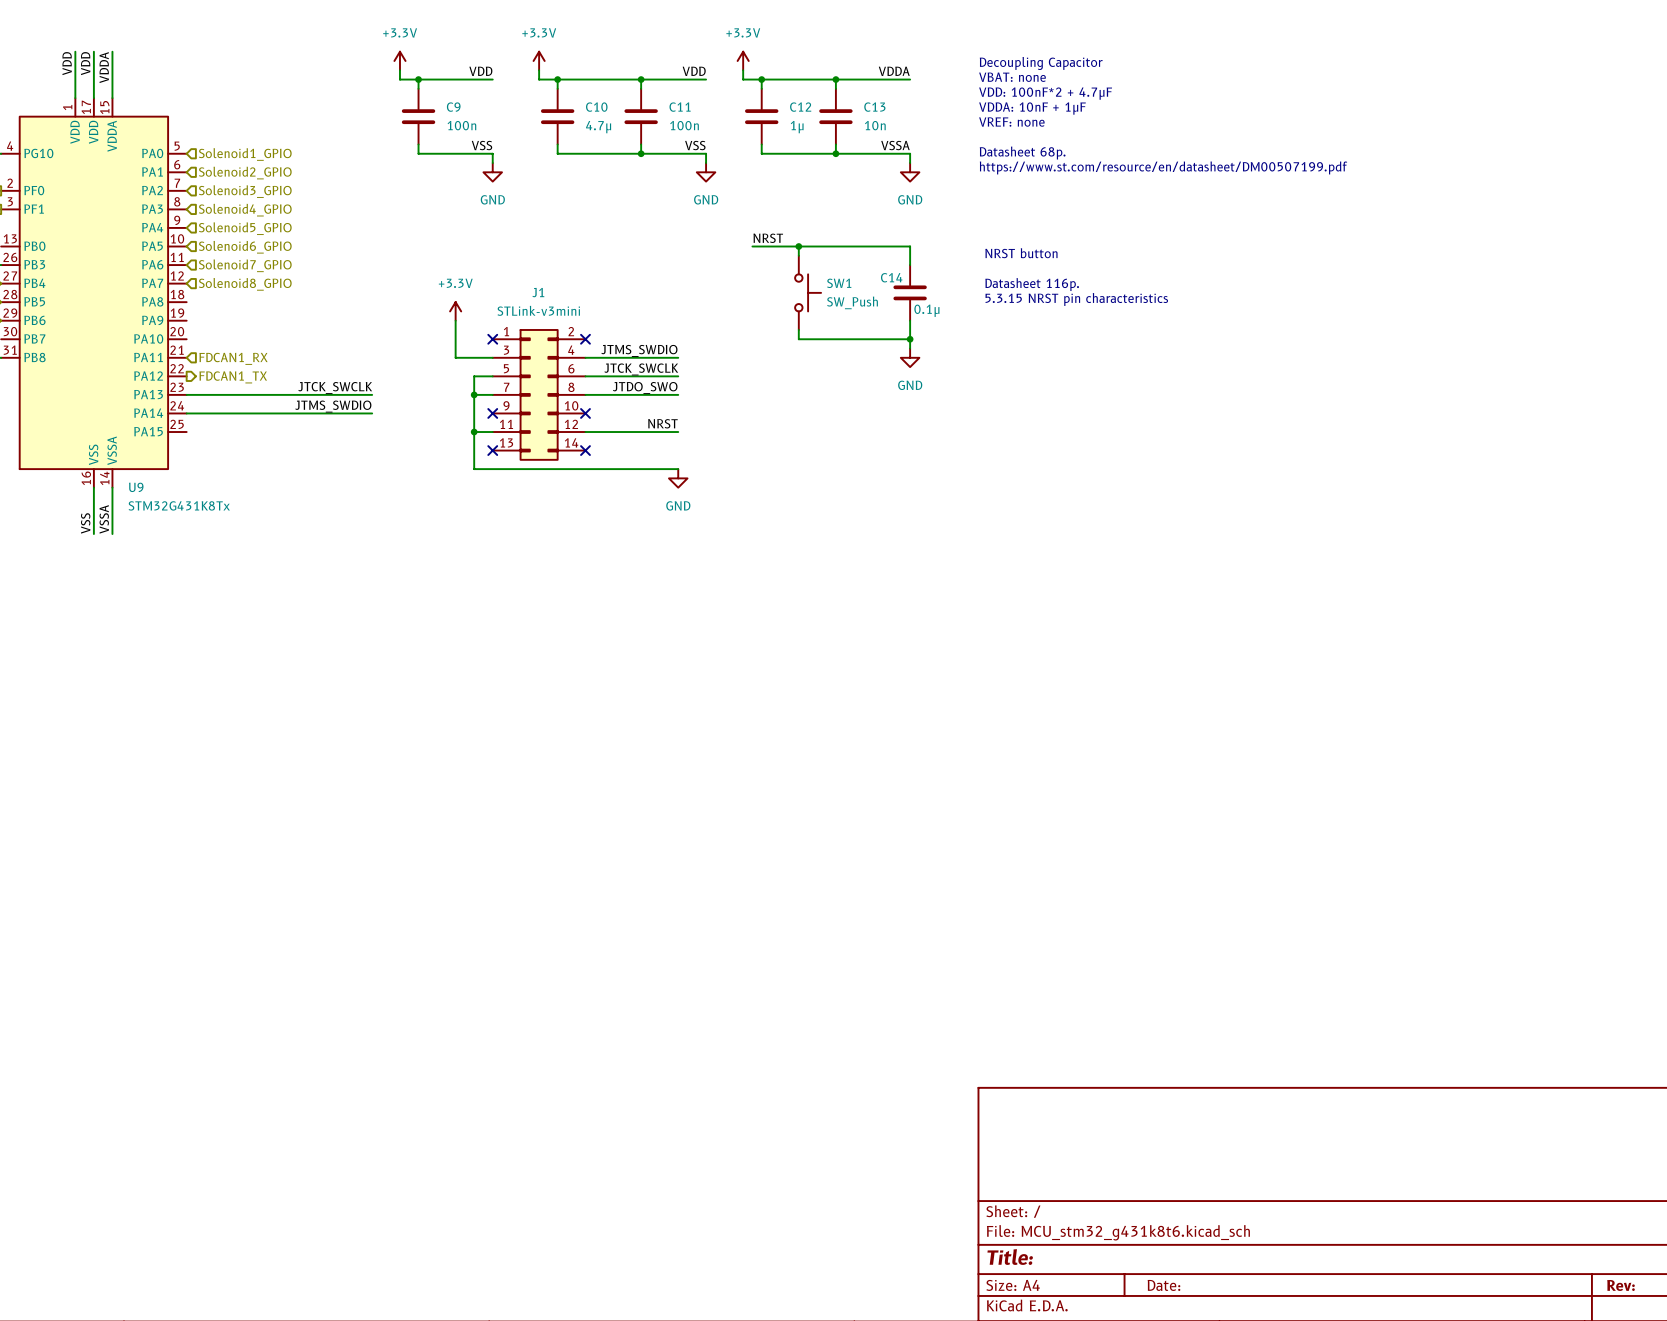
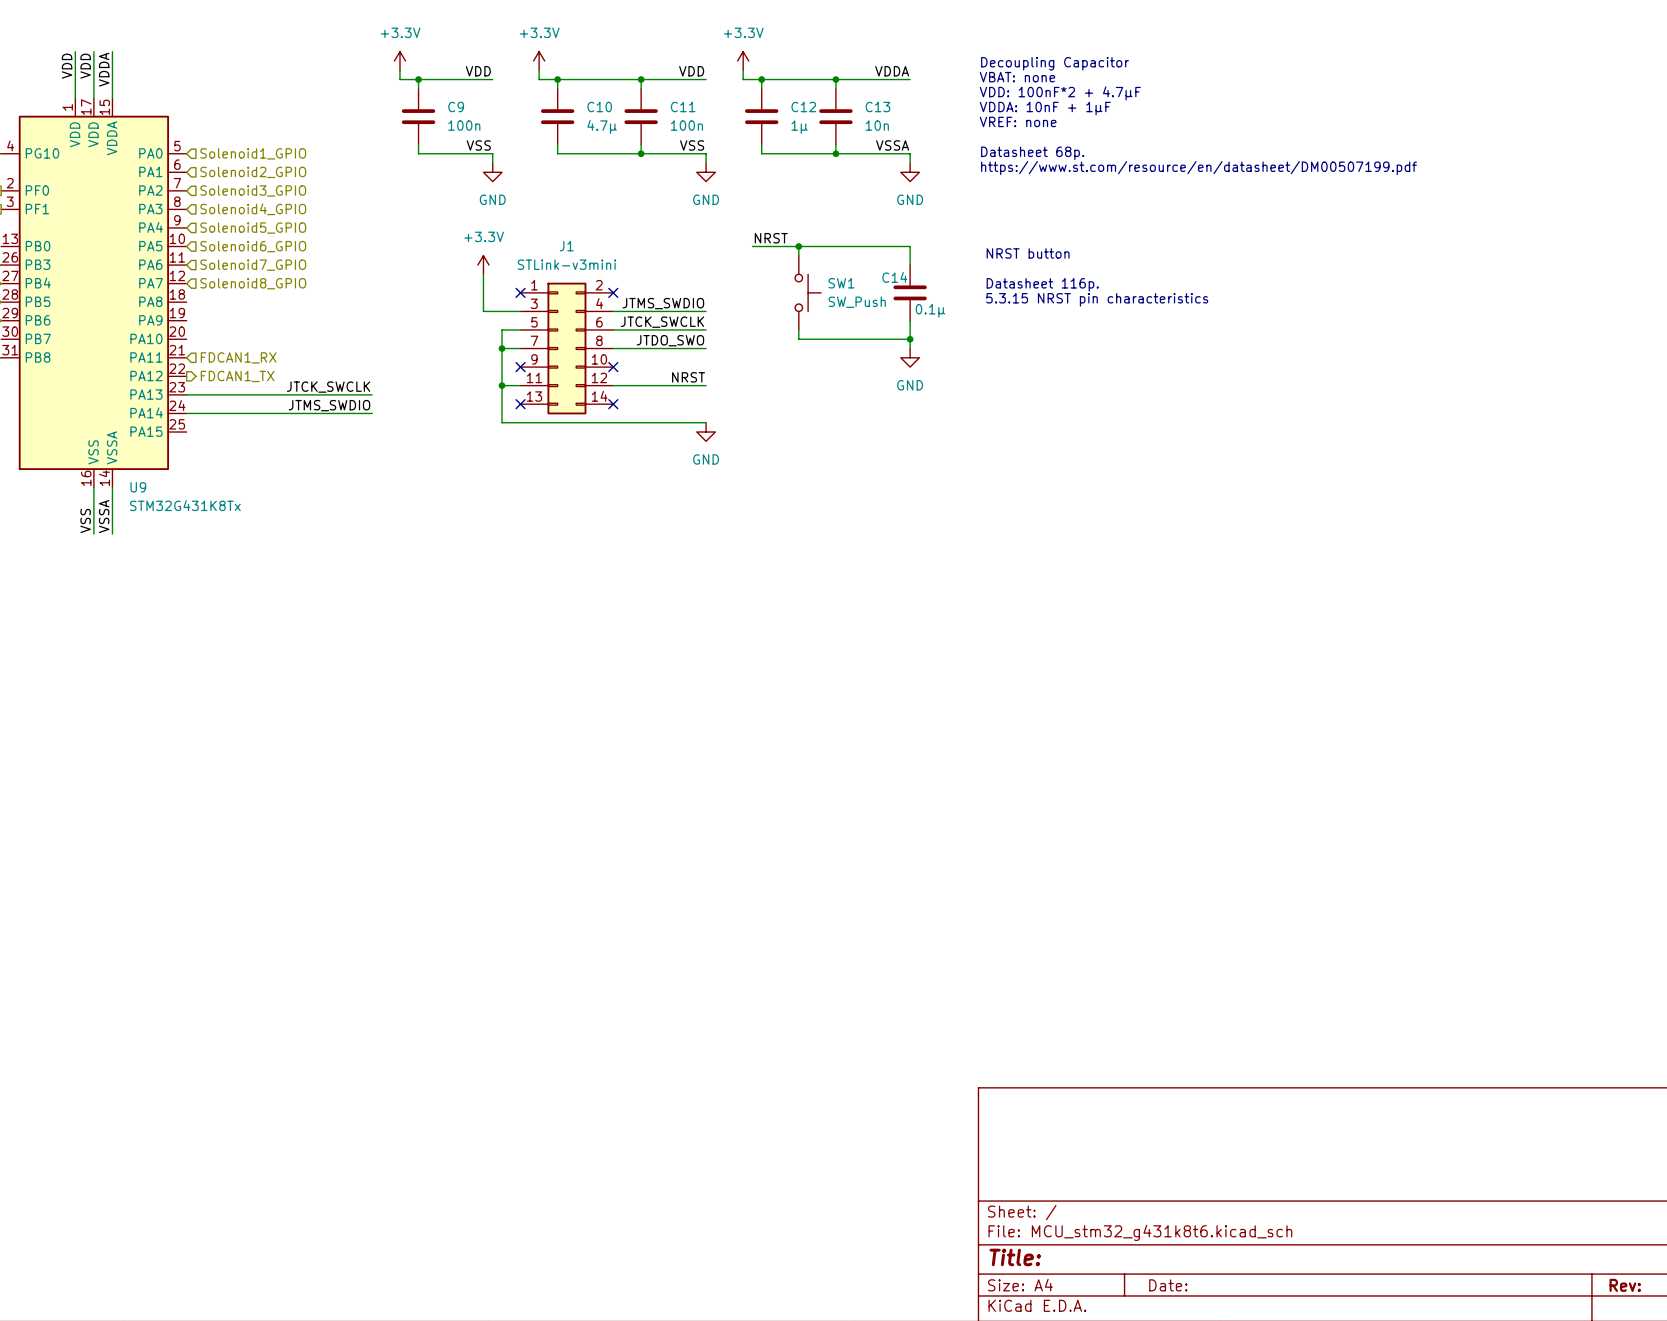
no-connect mark: none -> (520, 292)
no-connect mark: none -> (613, 292)
power symbol position: +3.3V (455, 311) -> +3.3V (483, 265)
wire: (455, 320) (455, 357) (492, 357) -> (483, 274) (483, 311) (520, 311)
no-connect mark: (492, 339) -> none
no-connect mark: (585, 339) -> none
junction: none -> (502, 348)
label position: JTMS_SWDIO (639, 350) -> JTMS_SWDIO (663, 303)
wire: (585, 357) (678, 357) -> (613, 311) (706, 311)
no-connect mark: none -> (520, 367)
no-connect mark: none -> (613, 367)
label position: JTCK_SWCLK (641, 369) -> JTCK_SWCLK (662, 322)
wire: (492, 376) (474, 376) (474, 469) (678, 469) -> (520, 329) (502, 329) (502, 422) (706, 422)
wire: (585, 376) (678, 376) -> (613, 329) (706, 329)
junction: none -> (502, 385)
label position: JTDO_SWO (645, 388) -> JTDO_SWO (670, 340)
wire: (474, 394) (492, 394) -> (502, 348) (520, 348)
junction: (474, 394) -> none
J1 position: (539, 394) -> (566, 348)
wire: (585, 394) (678, 394) -> (613, 348) (706, 348)
no-connect mark: none -> (520, 404)
no-connect mark: none -> (613, 404)
no-connect mark: (492, 413) -> none
no-connect mark: (585, 413) -> none
label position: NRST (662, 423) -> NRST (688, 377)
wire: (474, 432) (492, 432) -> (502, 385) (520, 385)
junction: (474, 432) -> none
wire: (585, 432) (678, 432) -> (613, 385) (706, 385)
no-connect mark: (492, 450) -> none
no-connect mark: (585, 450) -> none
power symbol position: GND (678, 478) -> GND (706, 432)

